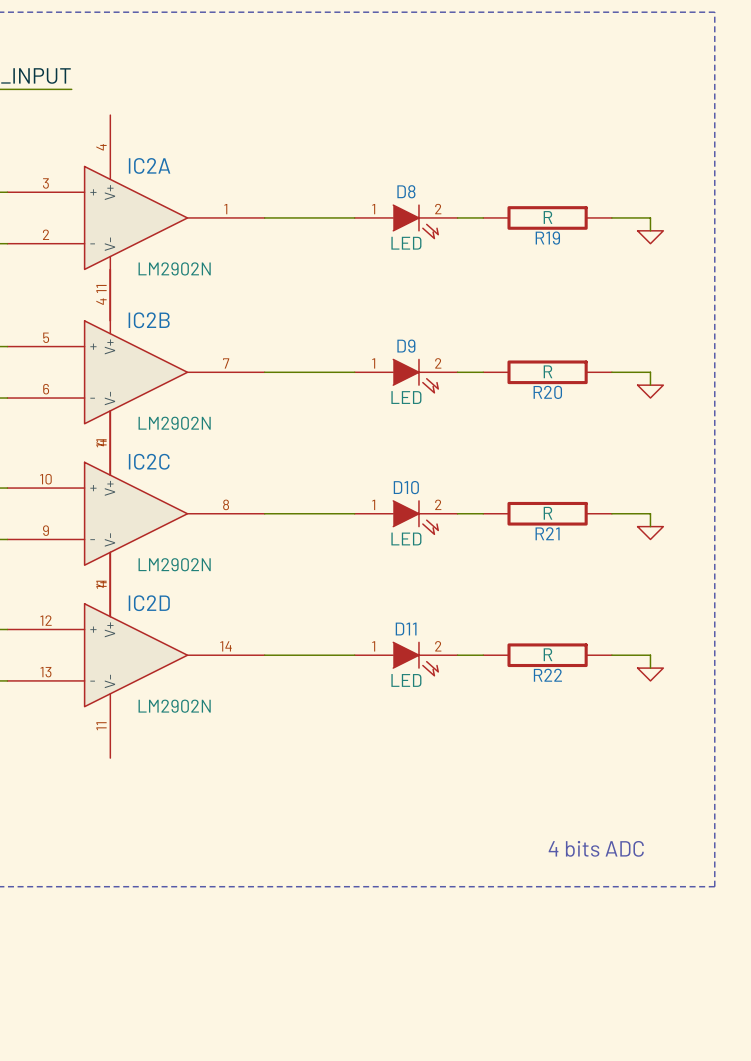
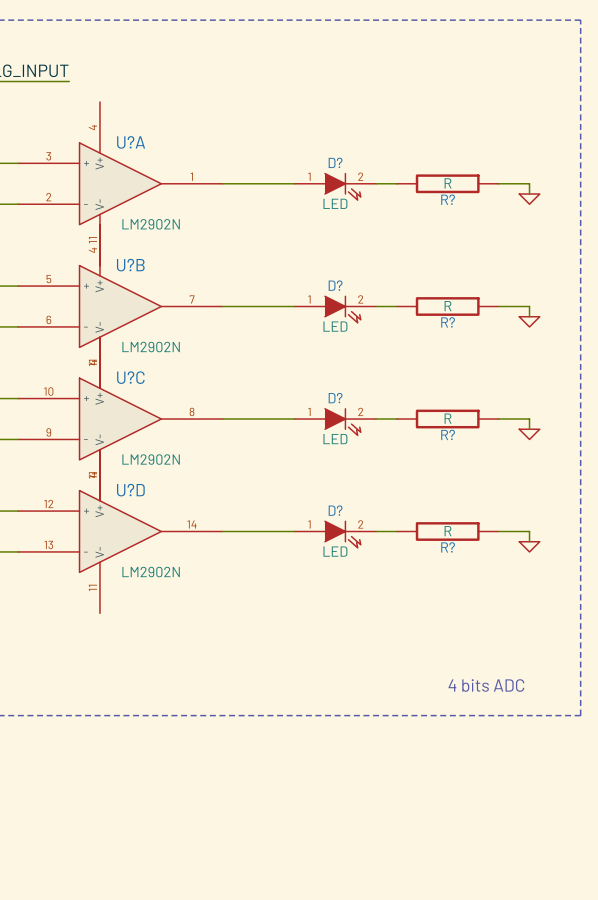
IC2A name: IC2A (149, 165) -> U?A (131, 142)
D8 name: D8 (406, 191) -> D? (335, 162)
R19 name: R19 (547, 238) -> R? (448, 199)
IC2B name: IC2B (149, 320) -> U?B (130, 265)
D9 name: D9 (406, 346) -> D? (335, 285)
R20 name: R20 (547, 392) -> R? (448, 322)
IC2C name: IC2C (149, 461) -> U?C (130, 377)
D10 name: D10 (406, 487) -> D? (335, 398)
R21 name: R21 (547, 533) -> R? (448, 434)
IC2D name: IC2D (149, 603) -> U?D (130, 490)
D11 name: D11 (406, 629) -> D? (335, 510)
R22 name: R22 (547, 675) -> R? (448, 547)

